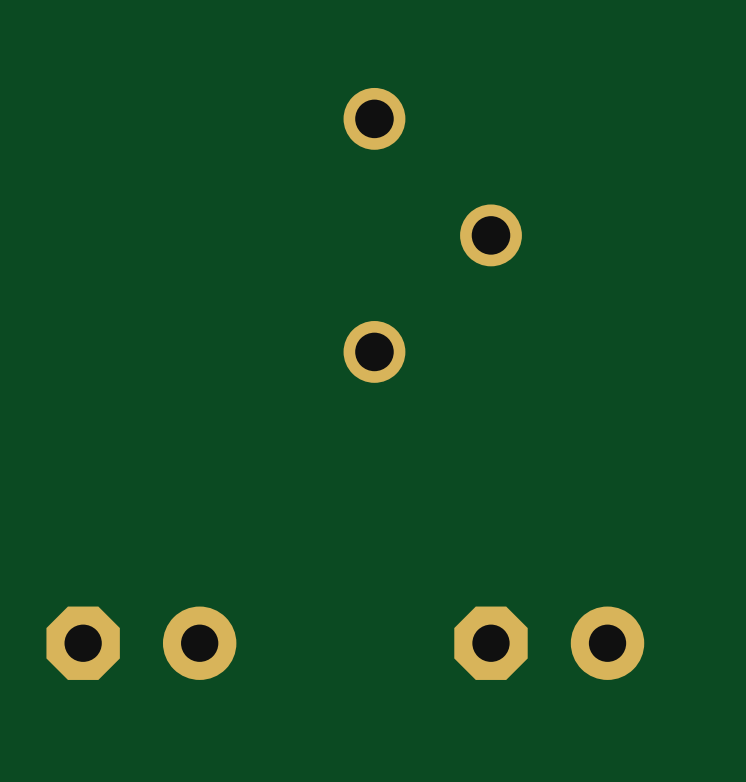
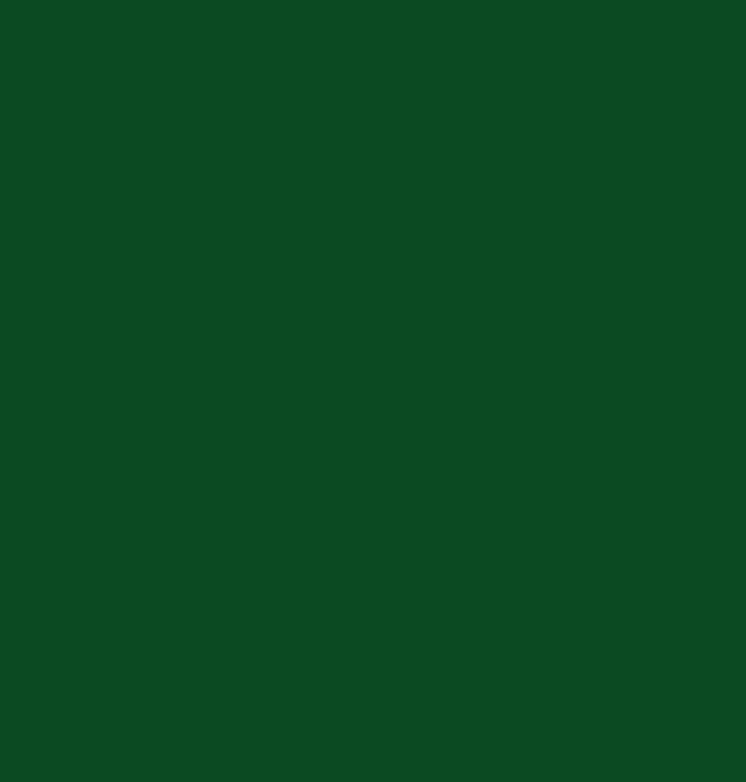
part: (432, 235) -> none
part: (141, 643) -> none
part: (549, 643) -> none

